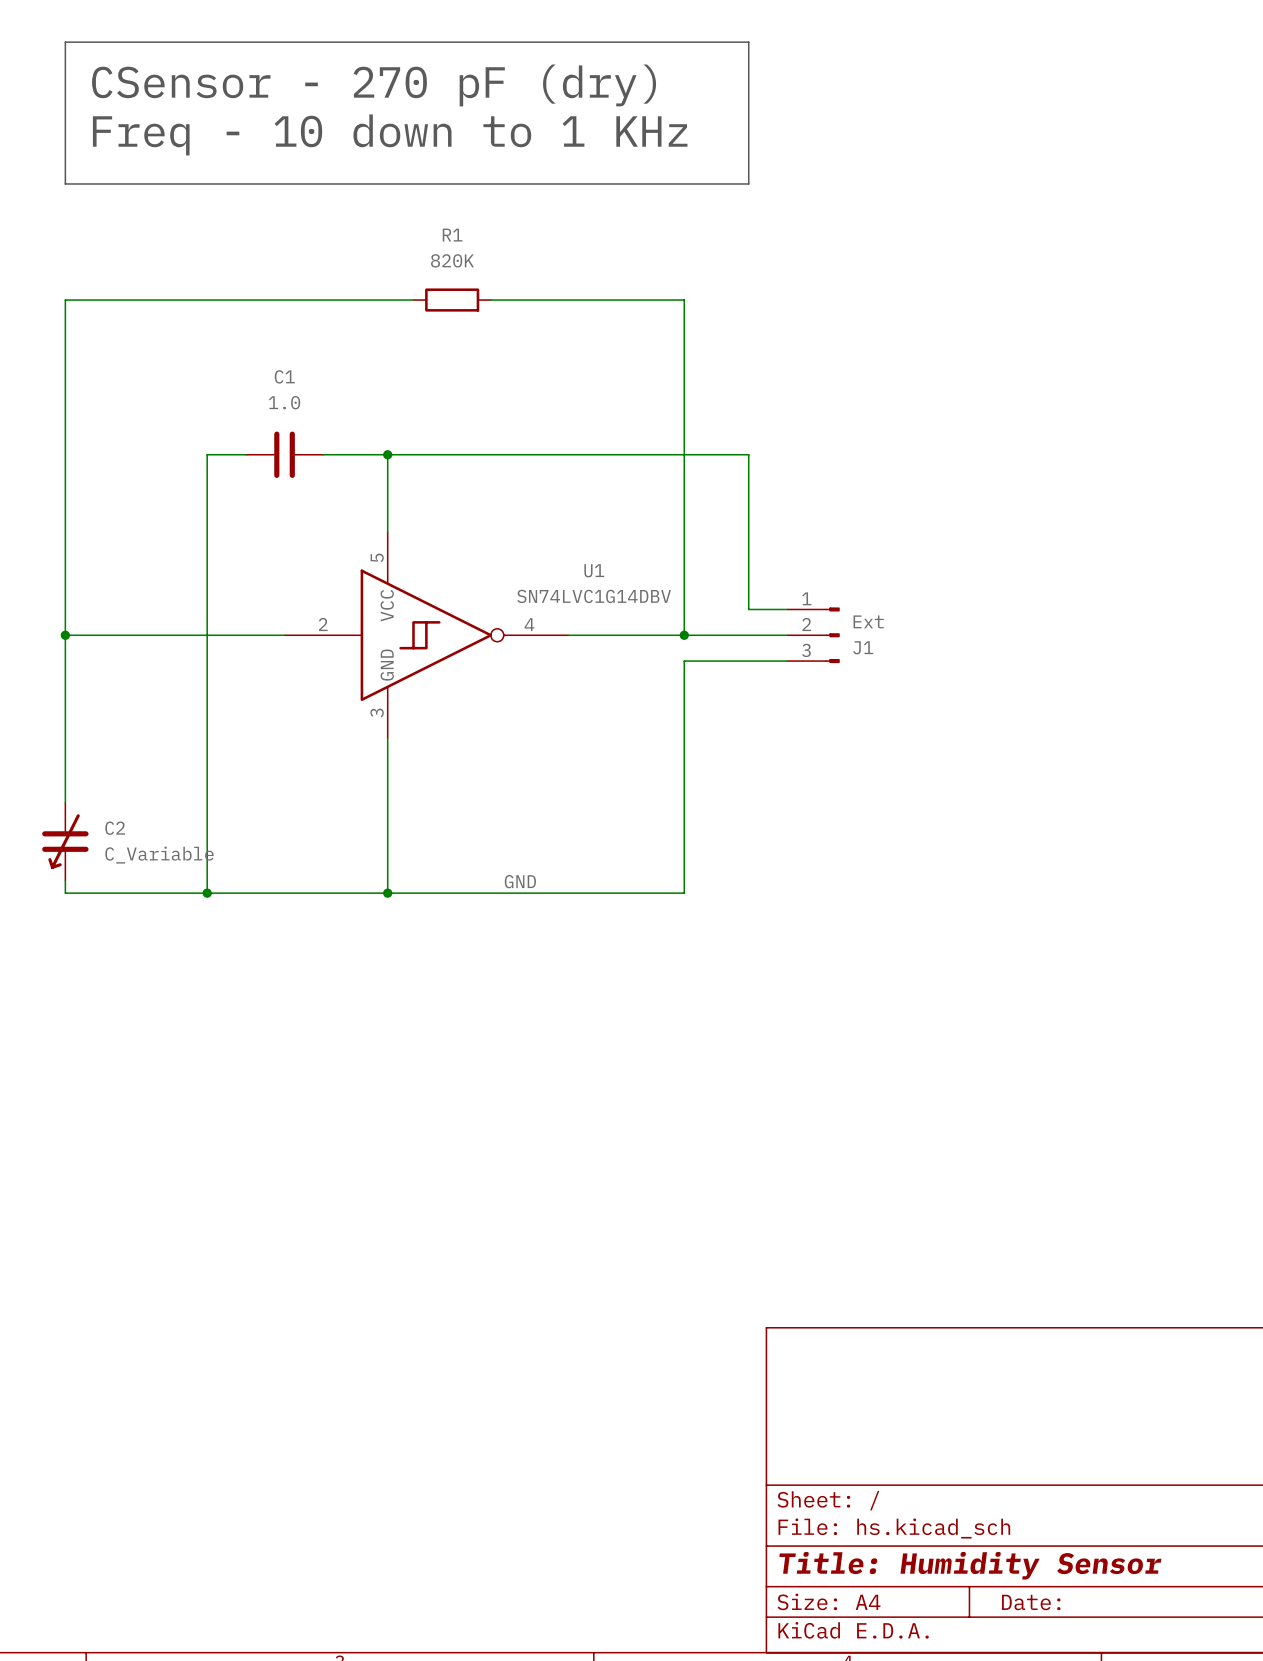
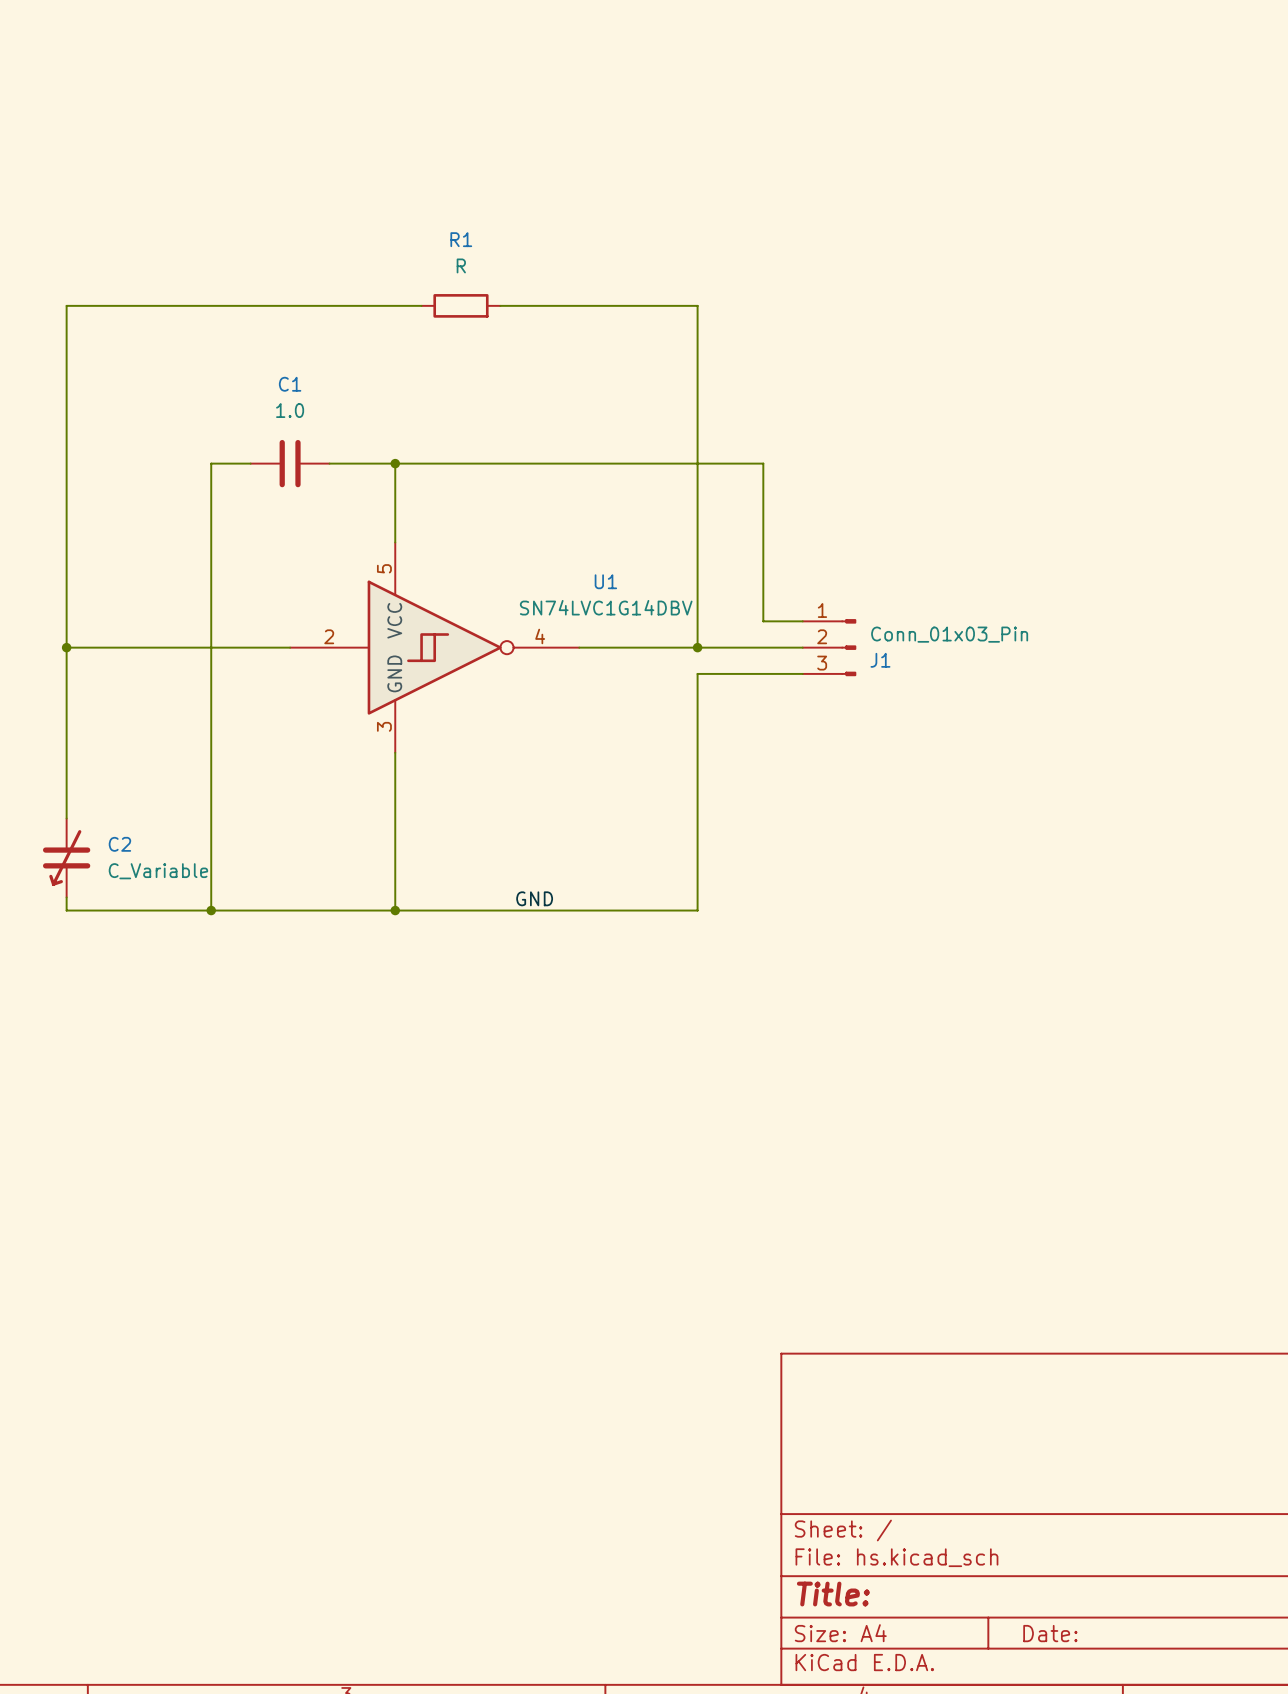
line: (65, 42) (748, 42) (748, 183) (65, 183) (65, 42) -> none
text: CSensor - 270 pF (dry) (374, 85) -> none
text: Freq - 10 down to 1 KHz (390, 134) -> none
R1 value: 820K (452, 260) -> R (461, 265)
J1 value: Ext (868, 621) -> Conn_01x03_Pin (949, 634)
title block: Title: Humidity Sensor (970, 1565) -> Title: (833, 1594)

